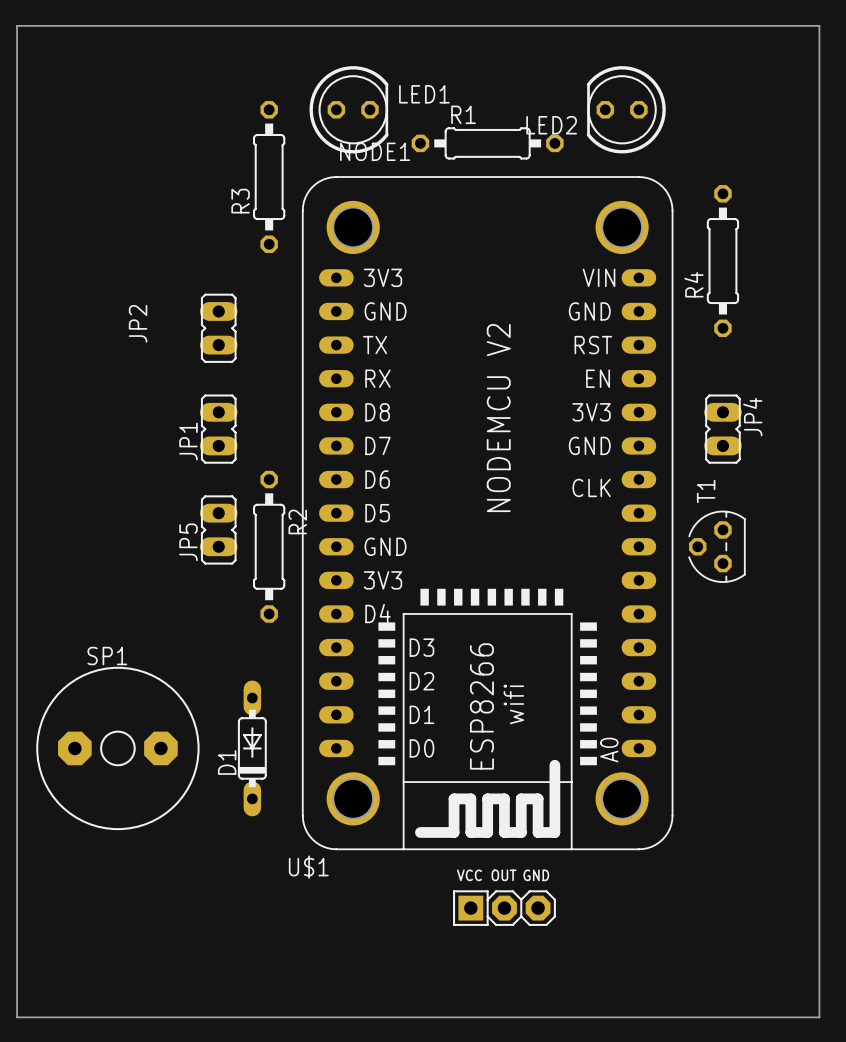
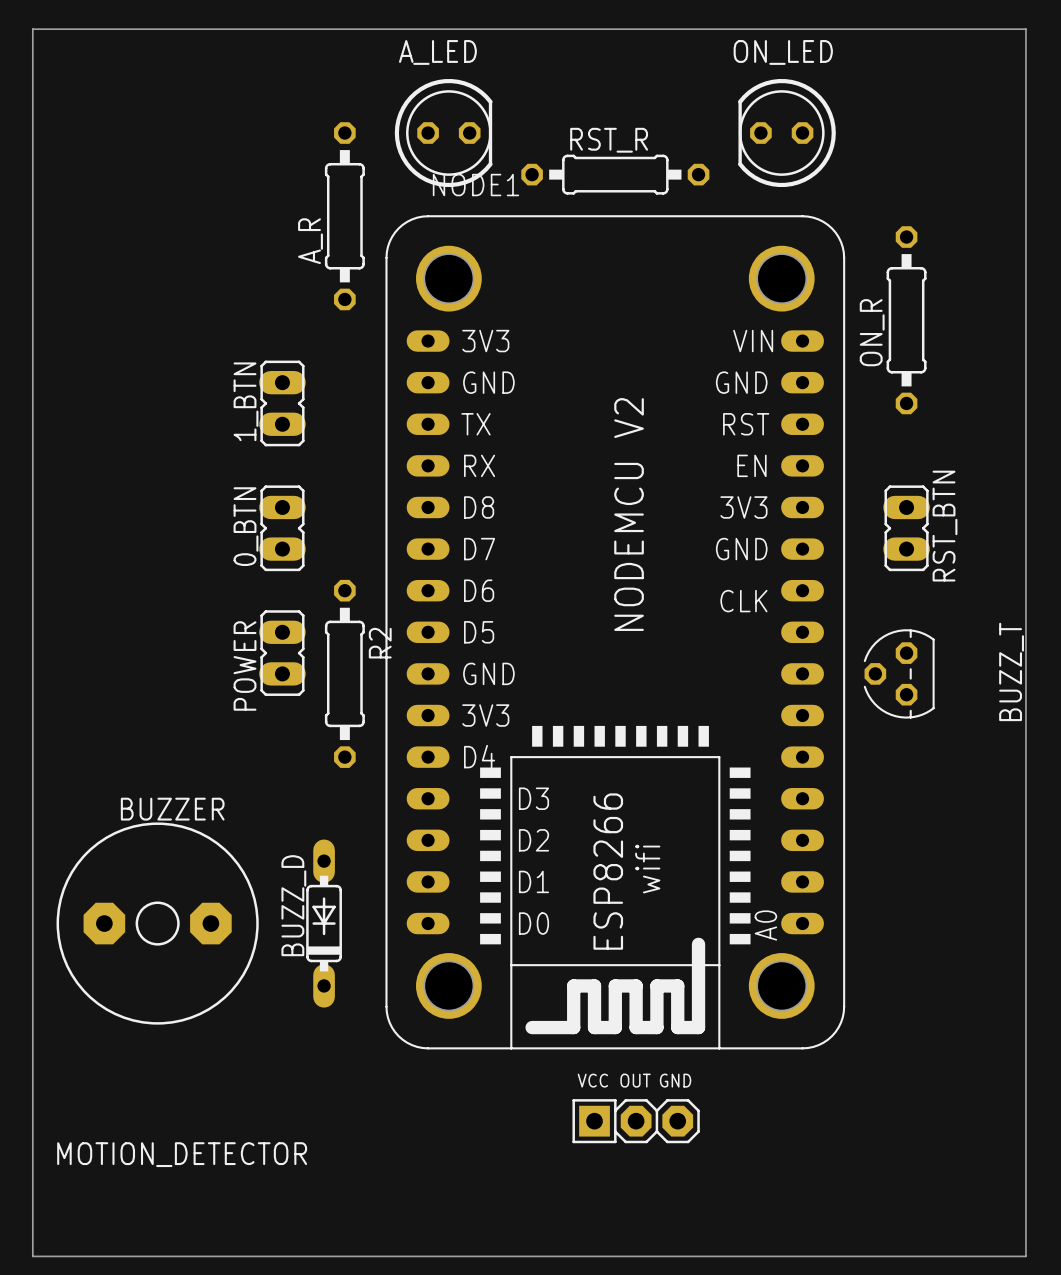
LED1 name: LED1 (424, 94) -> A_LED (437, 52)
R1 name: R1 (463, 114) -> RST_R (609, 140)
LED2 name: LED2 (551, 125) -> ON_LED (783, 52)
R3 name: R3 (240, 201) -> A_R (310, 241)
R4 name: R4 (693, 284) -> ON_R (872, 332)
JP2 name: JP2 (138, 323) -> 1_BTN (246, 401)
JP4 name: JP4 (752, 417) -> RST_BTN (945, 526)
JP1 name: JP1 (188, 441) -> 0_BTN (246, 526)
T1 name: T1 (706, 491) -> BUZZ_T (1011, 671)
JP5 name: JP5 (188, 542) -> POWER (245, 666)
SP1 name: SP1 (107, 656) -> BUZZER (172, 809)
D1 name: D1 (227, 762) -> BUZZ_D (293, 905)
U$1 name: U$1 (308, 867) -> MOTION_DETECTOR (182, 1154)

